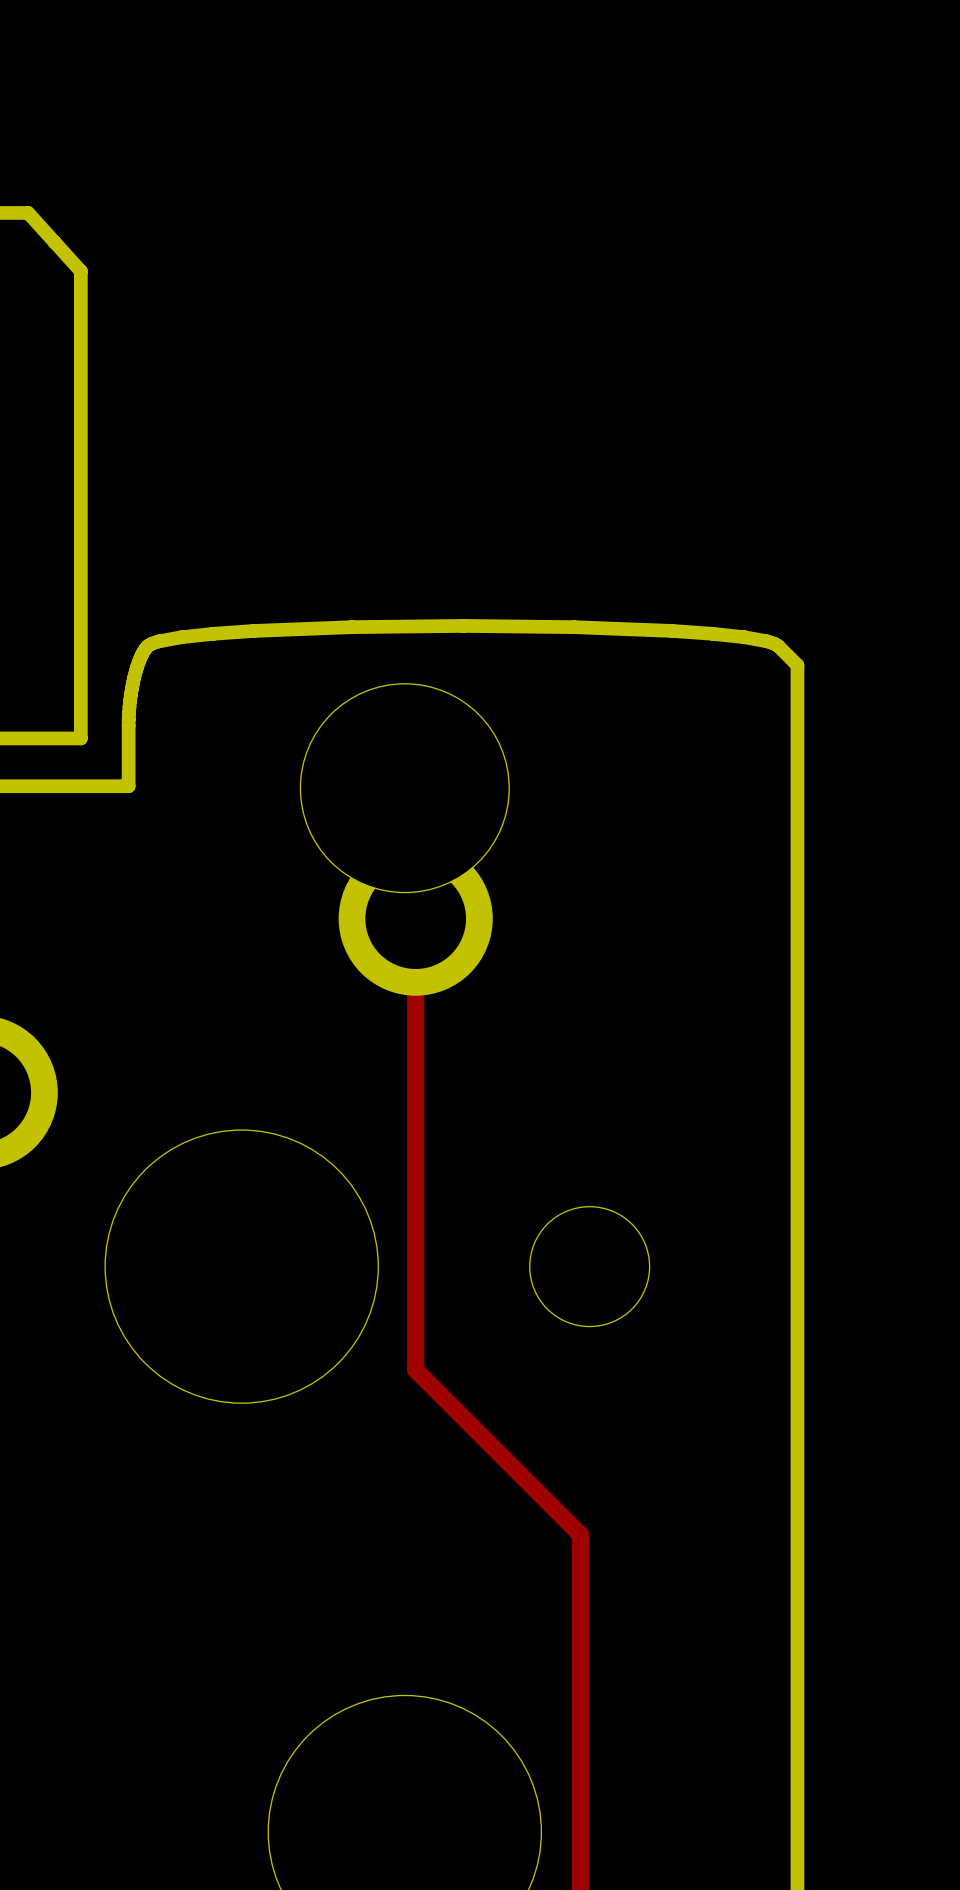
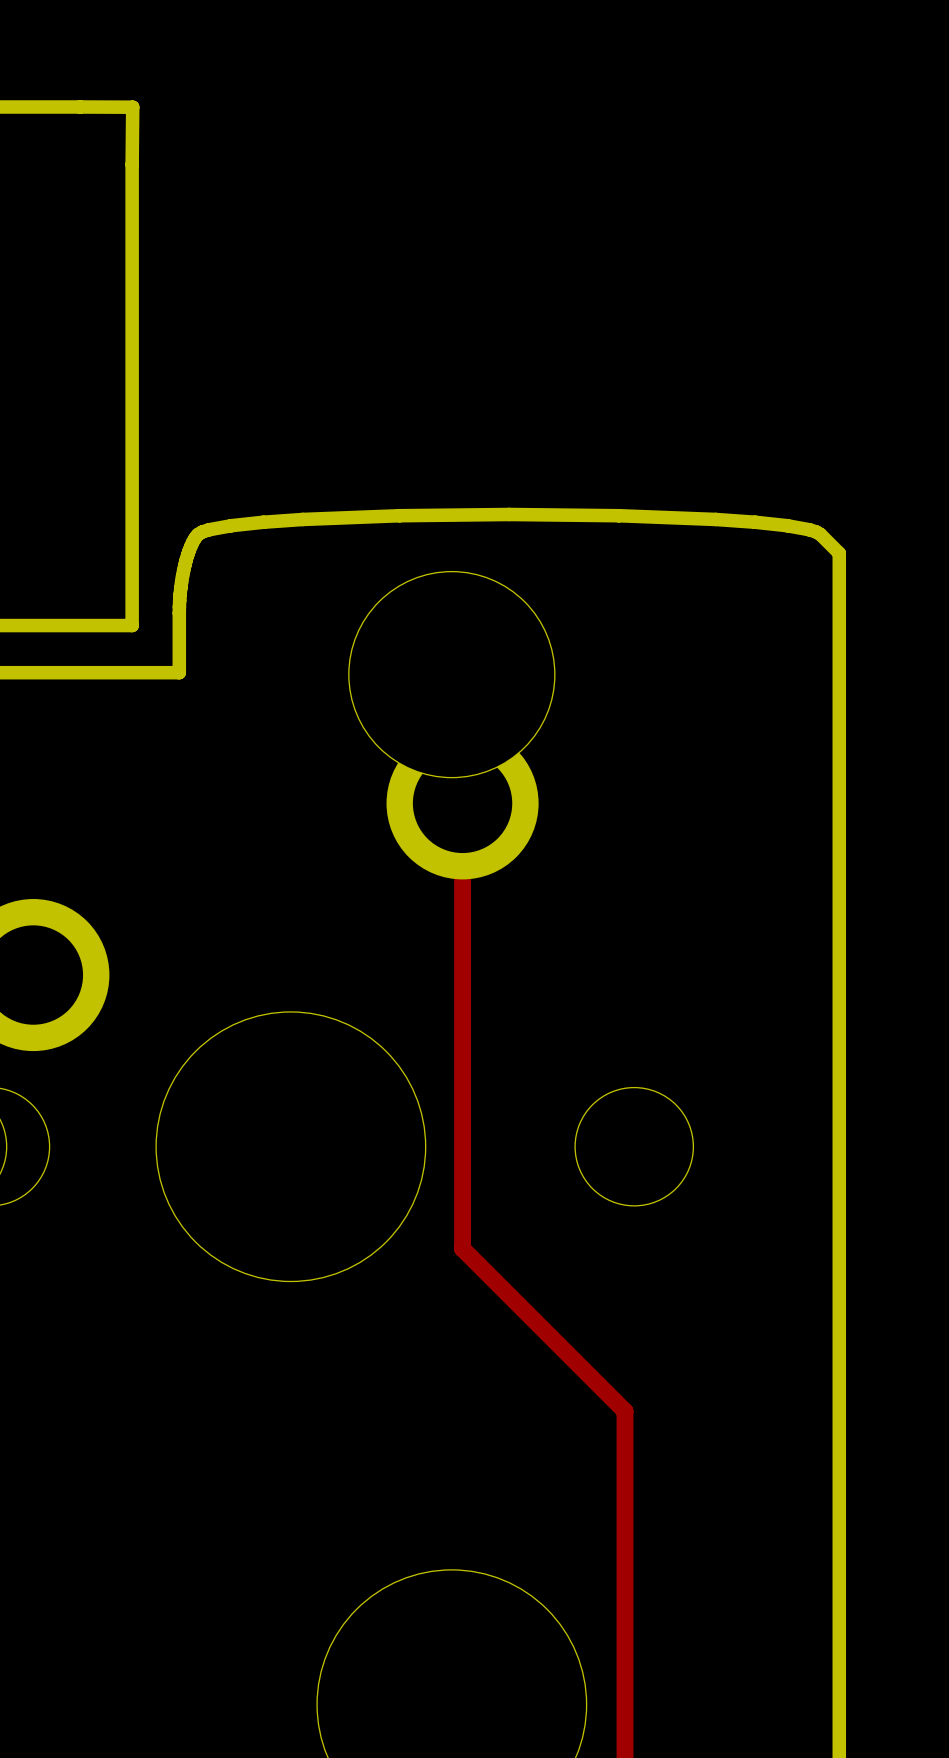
board edge: (28, 212) (80, 271) -> (80, 107) (132, 107) (132, 164)

